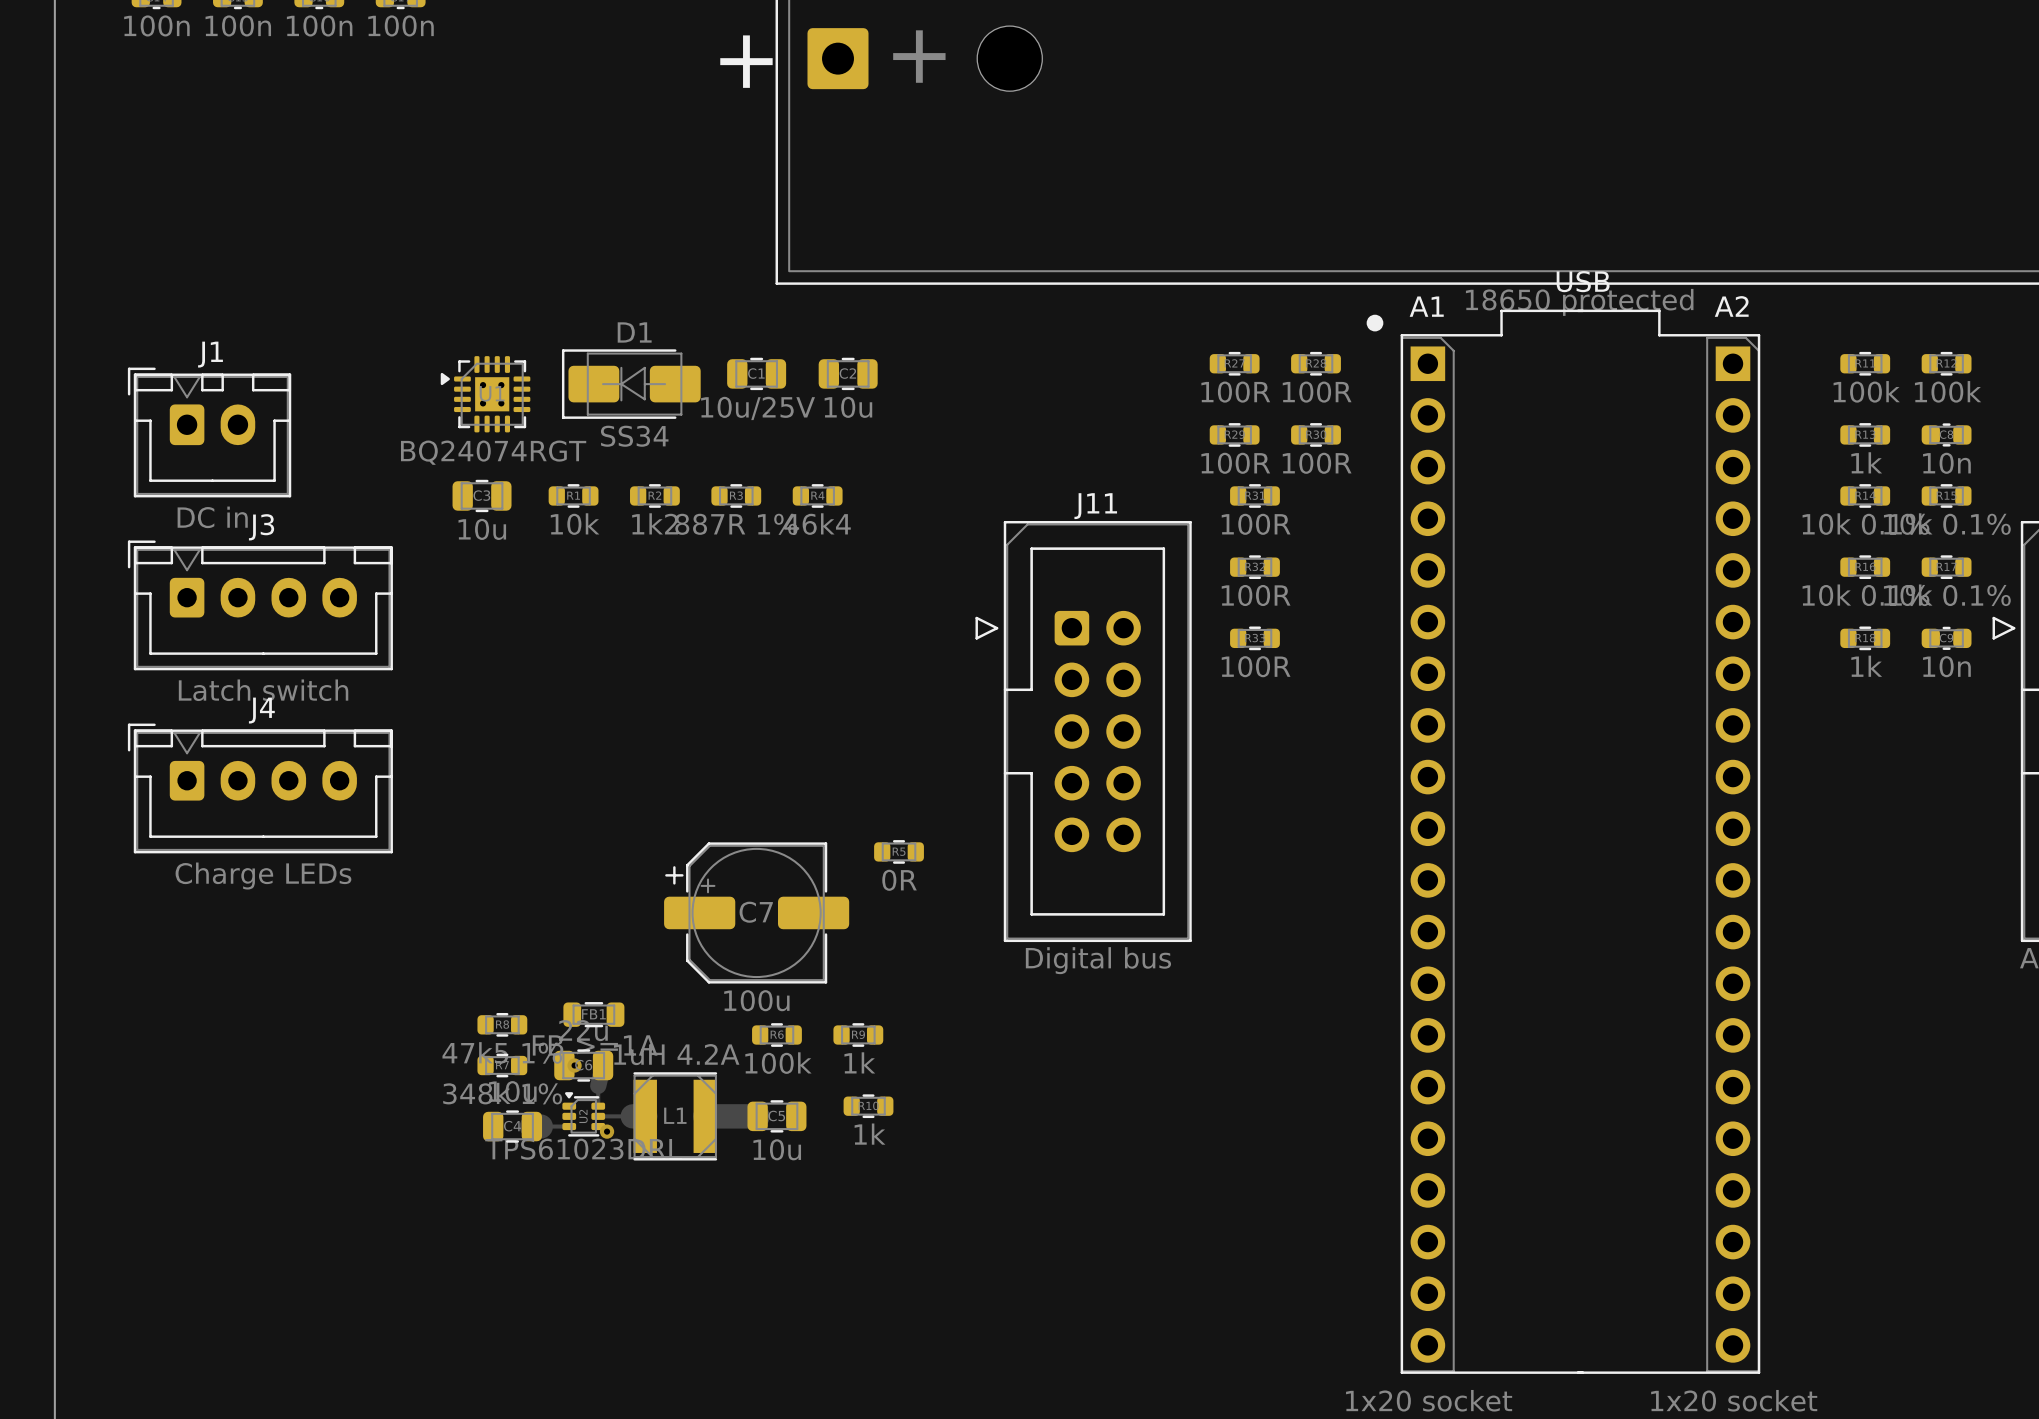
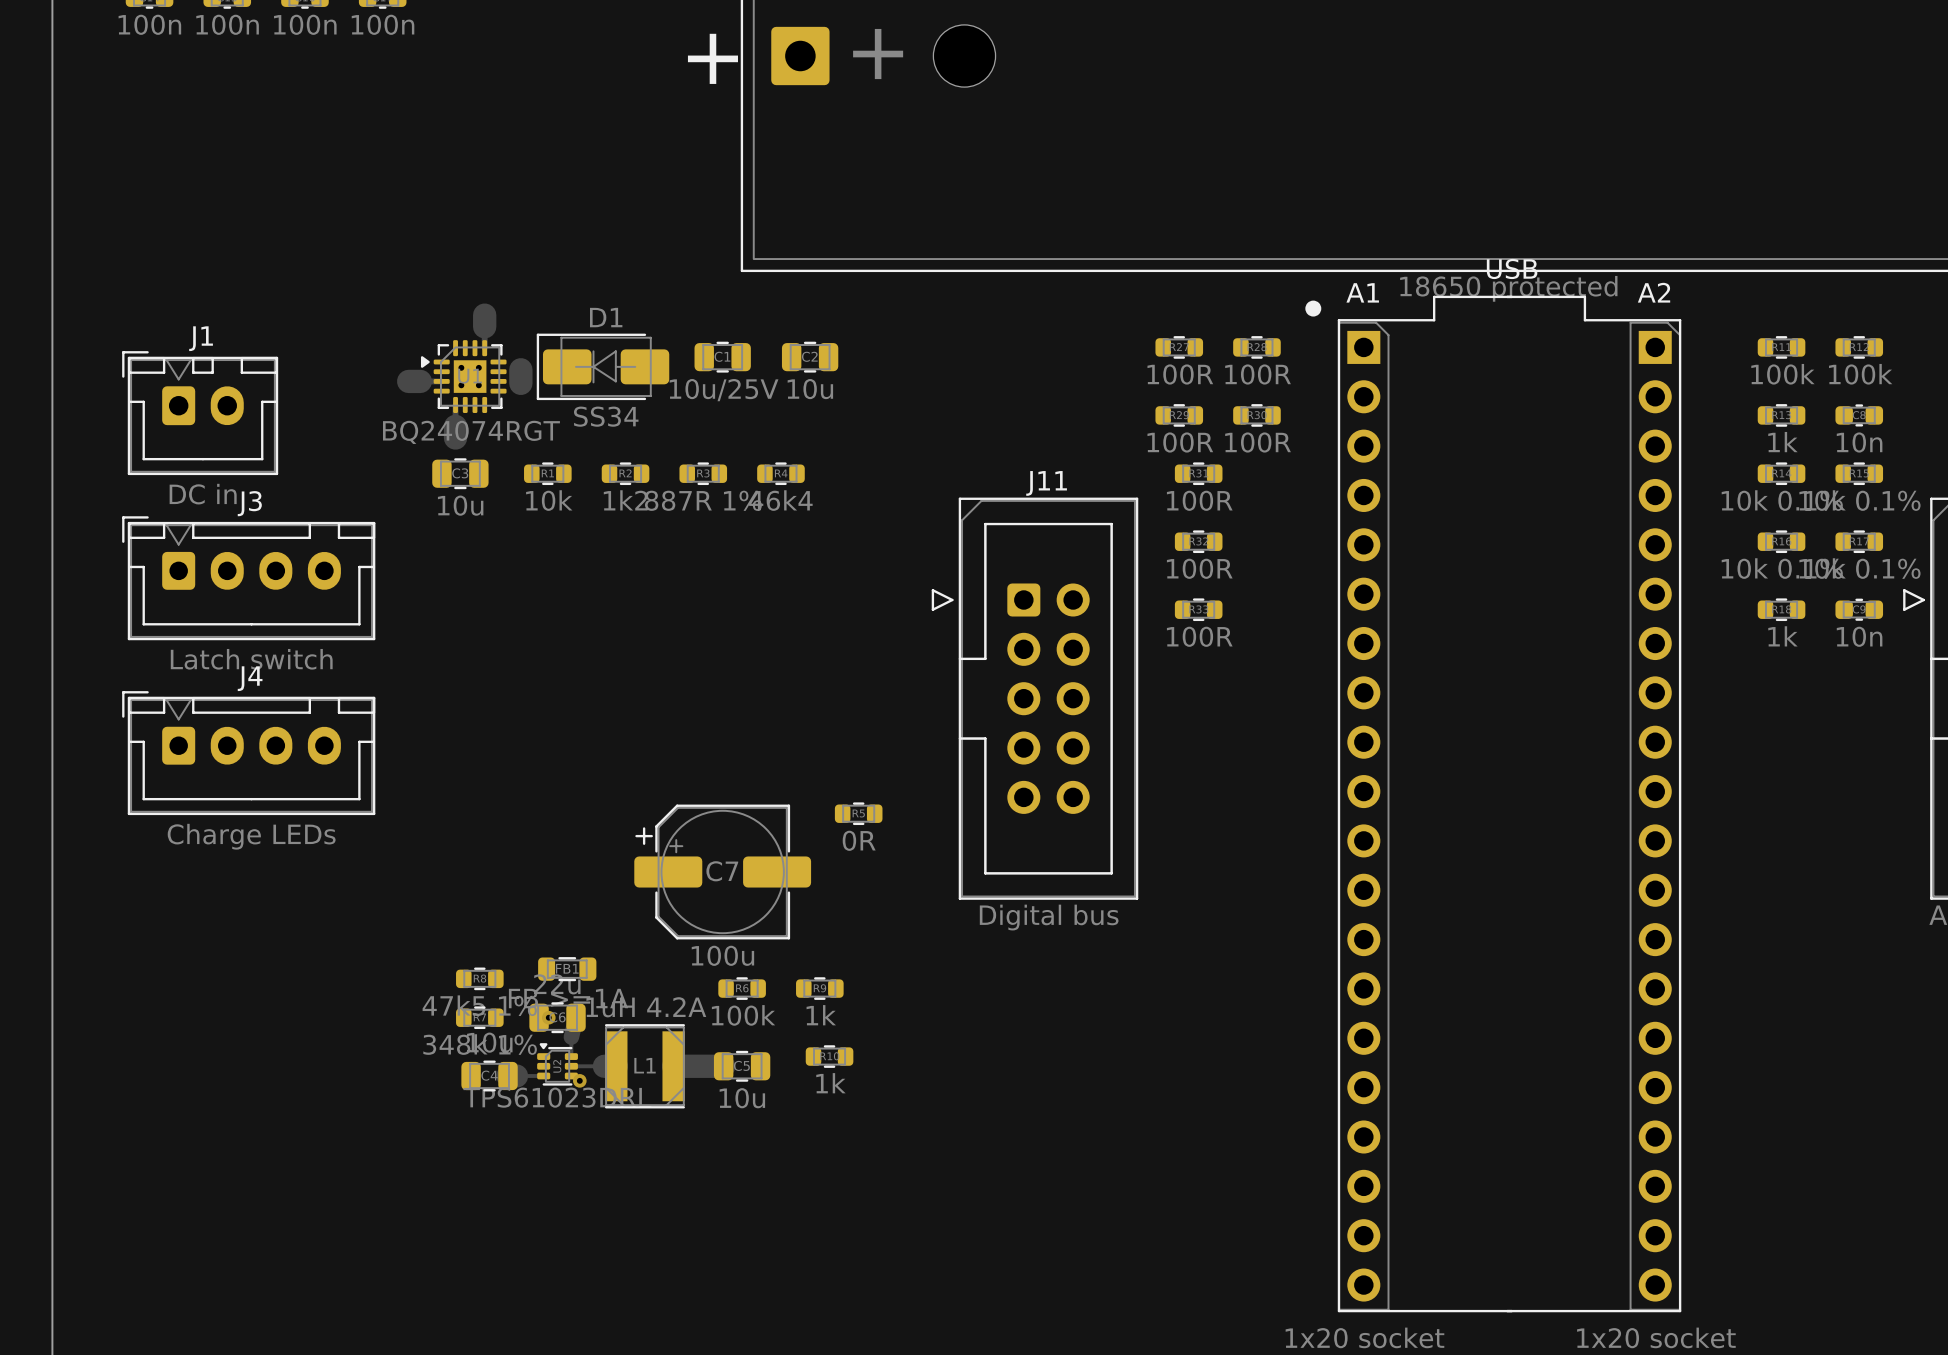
track: none -> (484, 315) (484, 348)
track: none -> (520, 369) (520, 383)
track: none -> (408, 381) (441, 381)
track: none -> (455, 404) (455, 438)

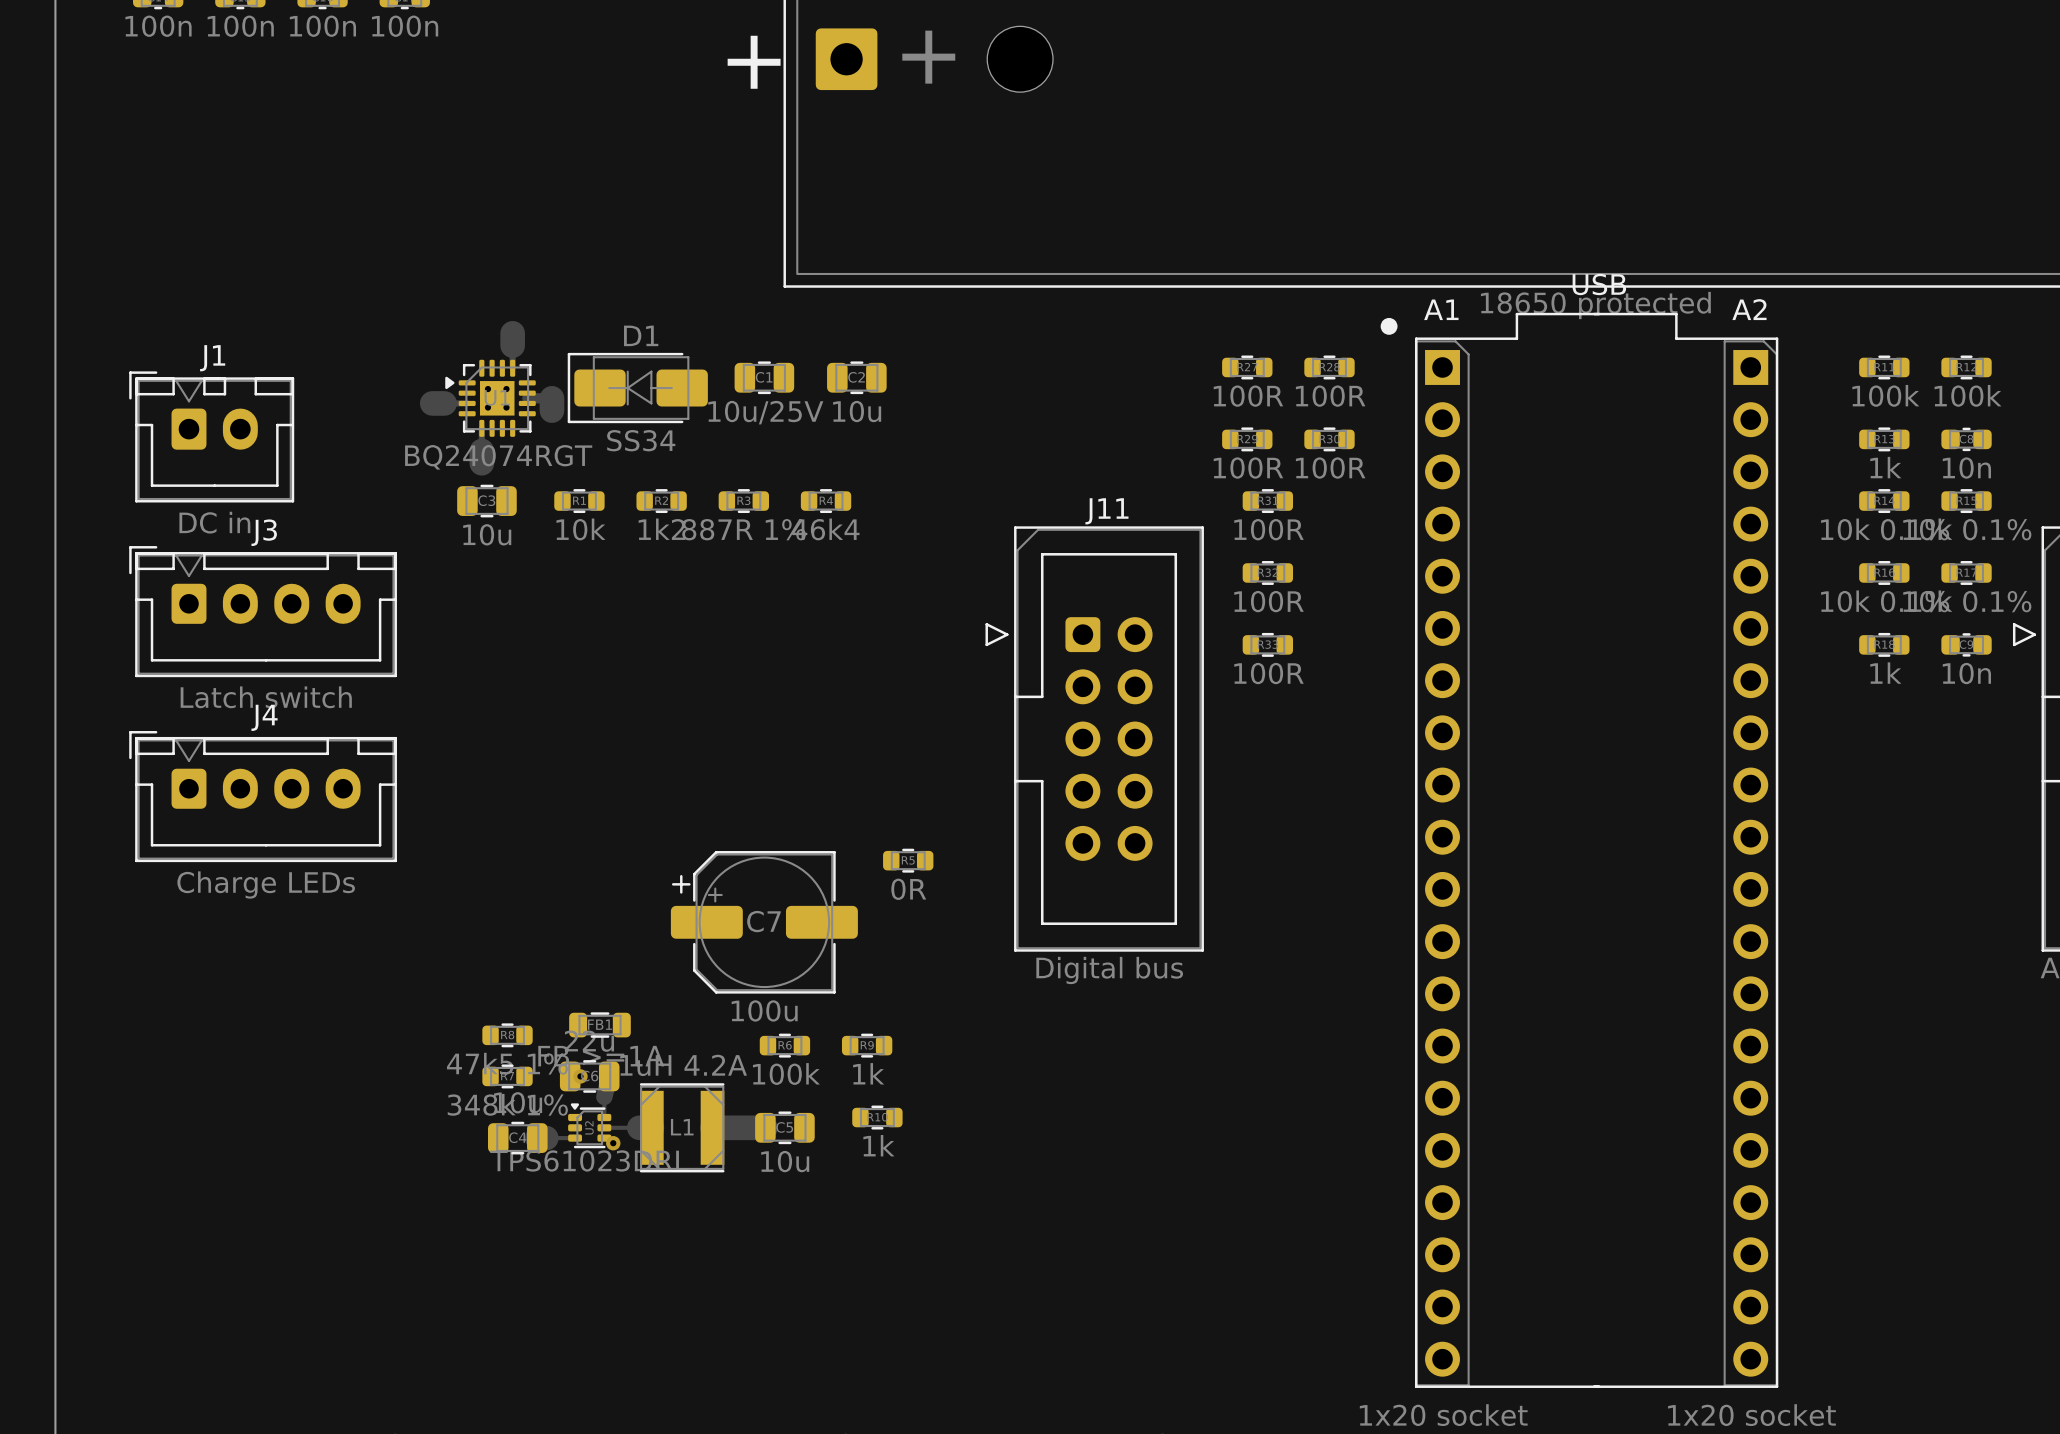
track: (520, 369) (520, 383) -> none
track: none -> (527, 398) (551, 398) (551, 410)

